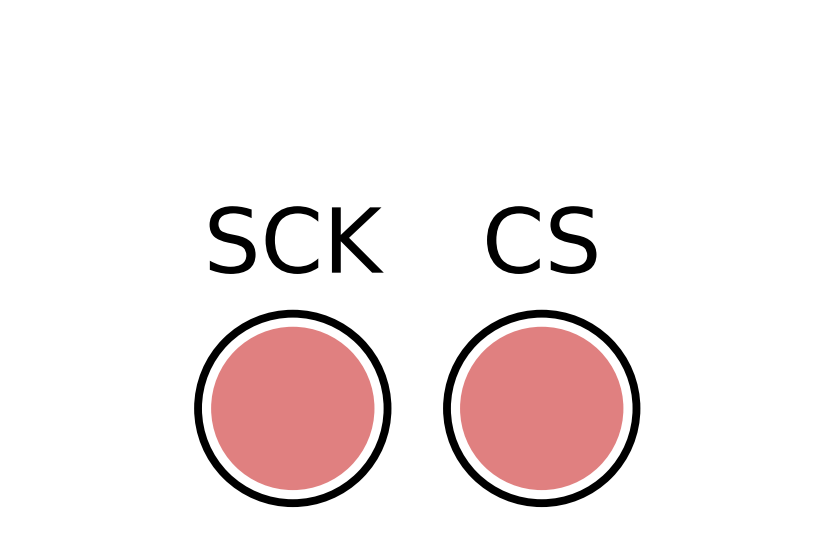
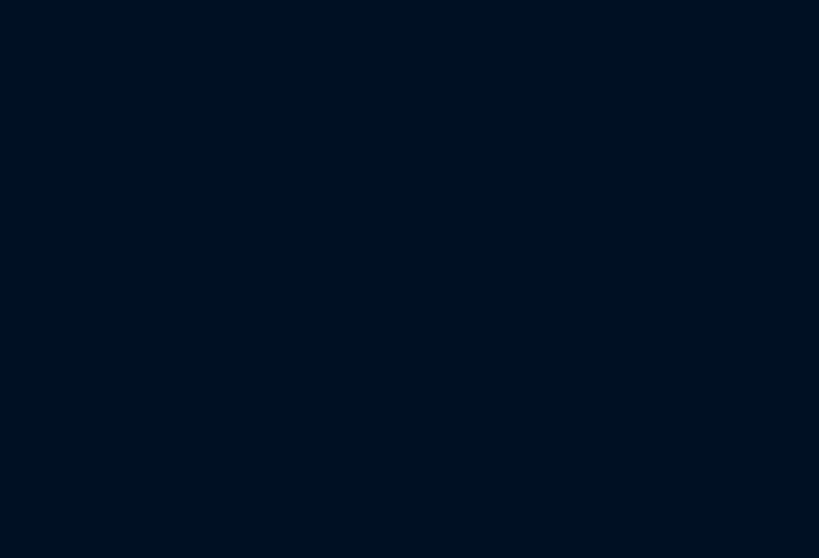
SCK: (292, 408) -> none
CS: (541, 408) -> none

